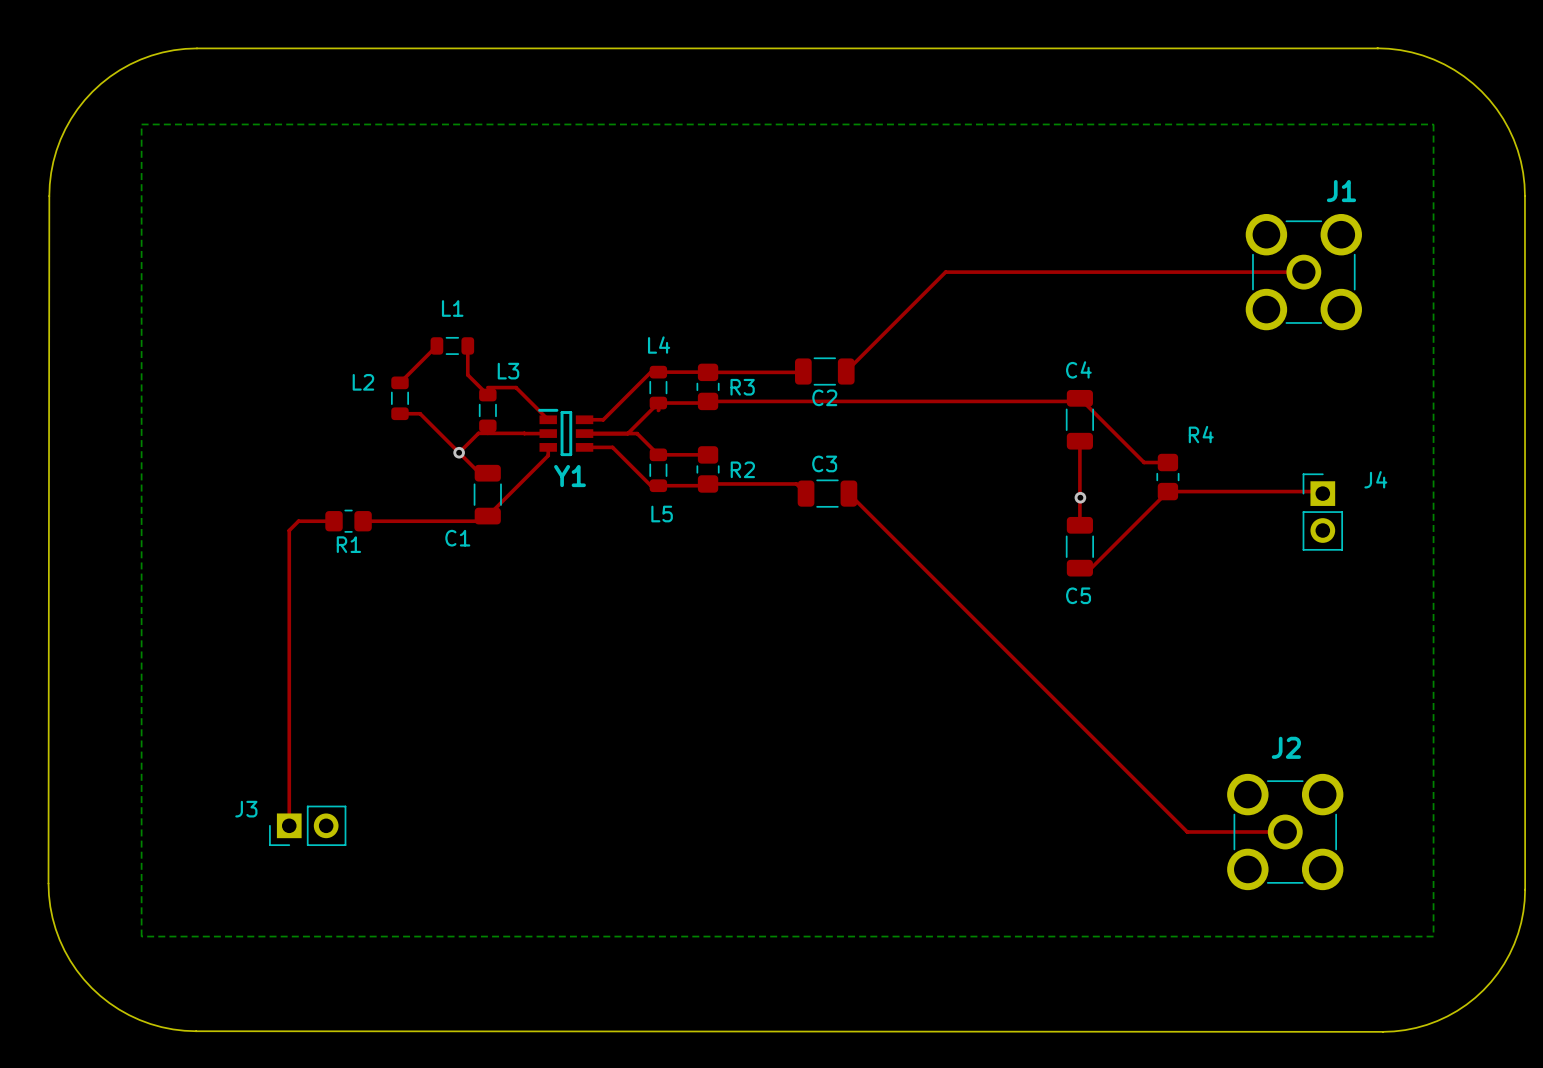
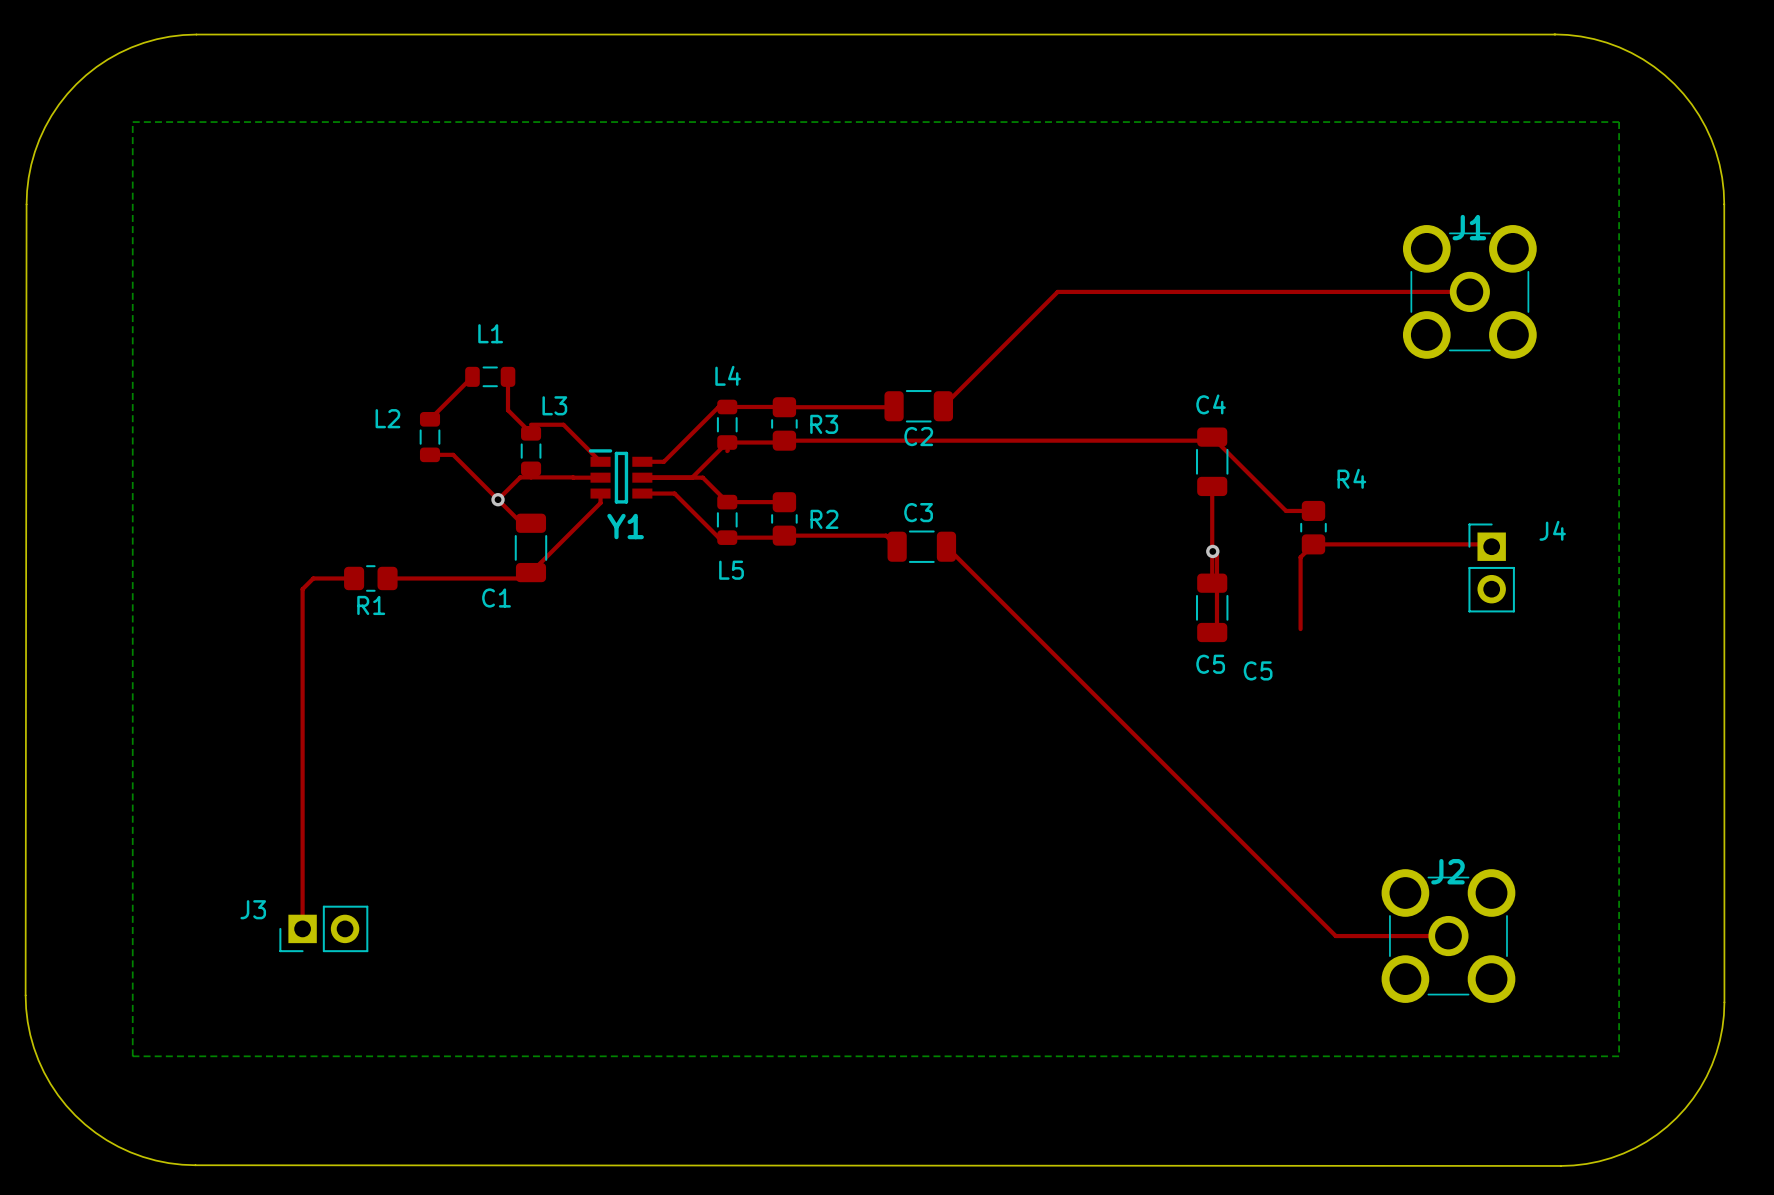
J1 name position: J1 (1341, 191) -> J1 (1469, 227)
top track: none -> (1212, 551) (1216, 555) (1216, 629)
top track: (1156, 502) (1091, 568) (1079, 568) -> (1300, 557) (1300, 629)
text: none -> C5 (1258, 670)
J2 name position: J2 (1286, 747) -> J2 (1447, 871)

